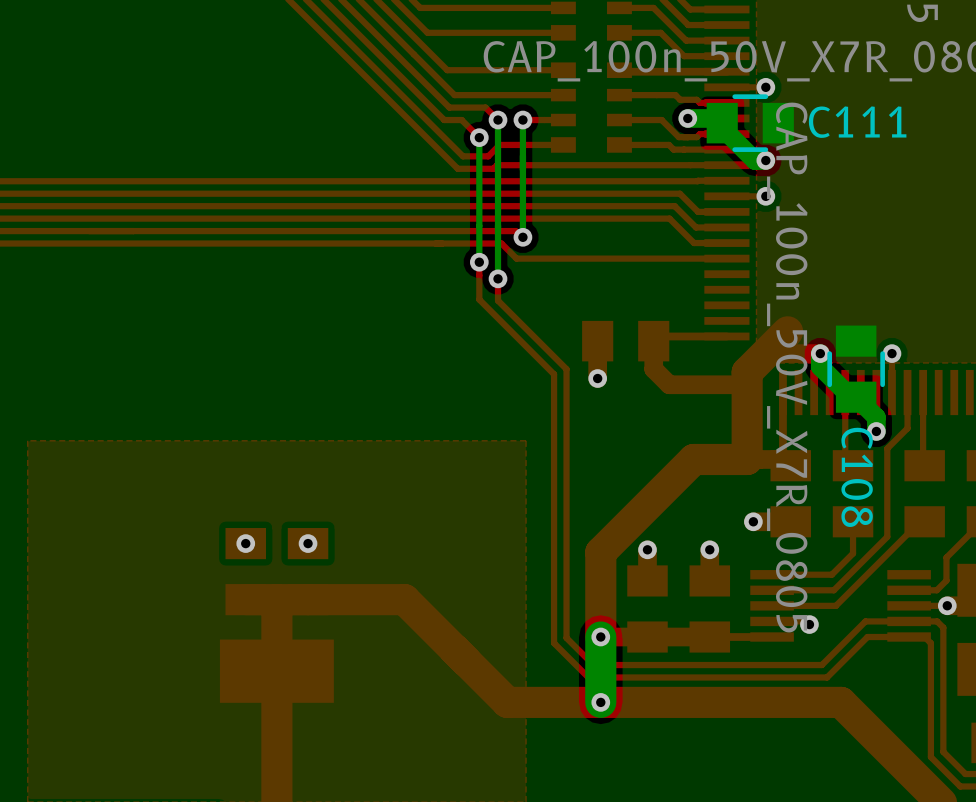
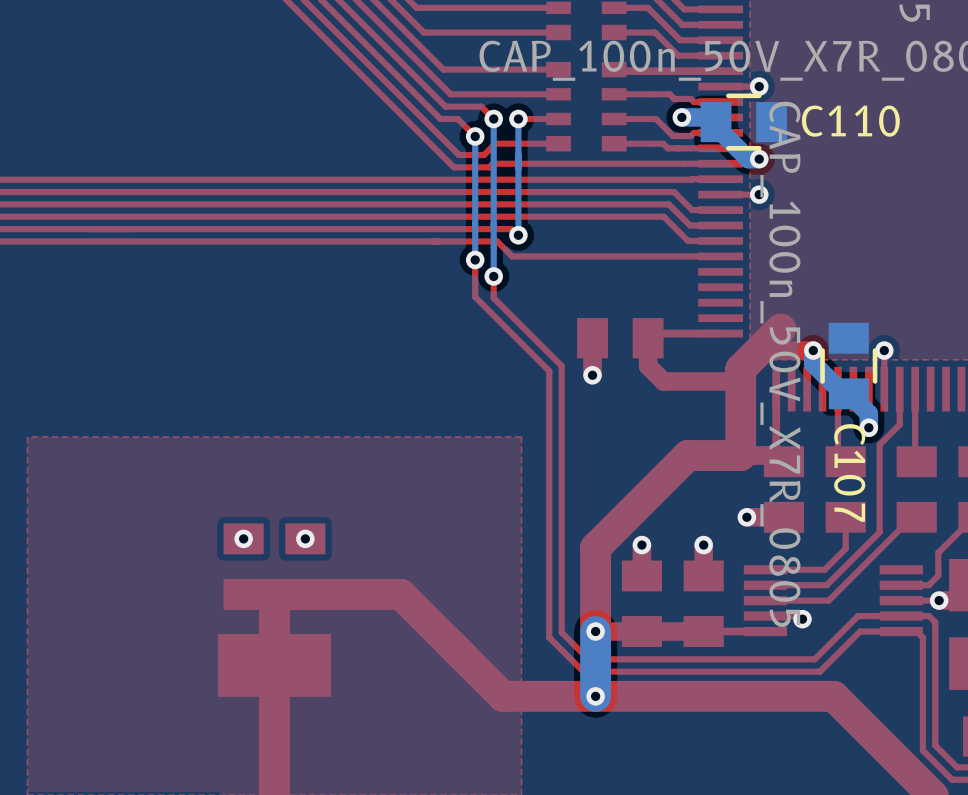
C111 name: C111 (857, 122) -> C110 (850, 121)
C108 name: C108 (857, 477) -> C107 (849, 472)

